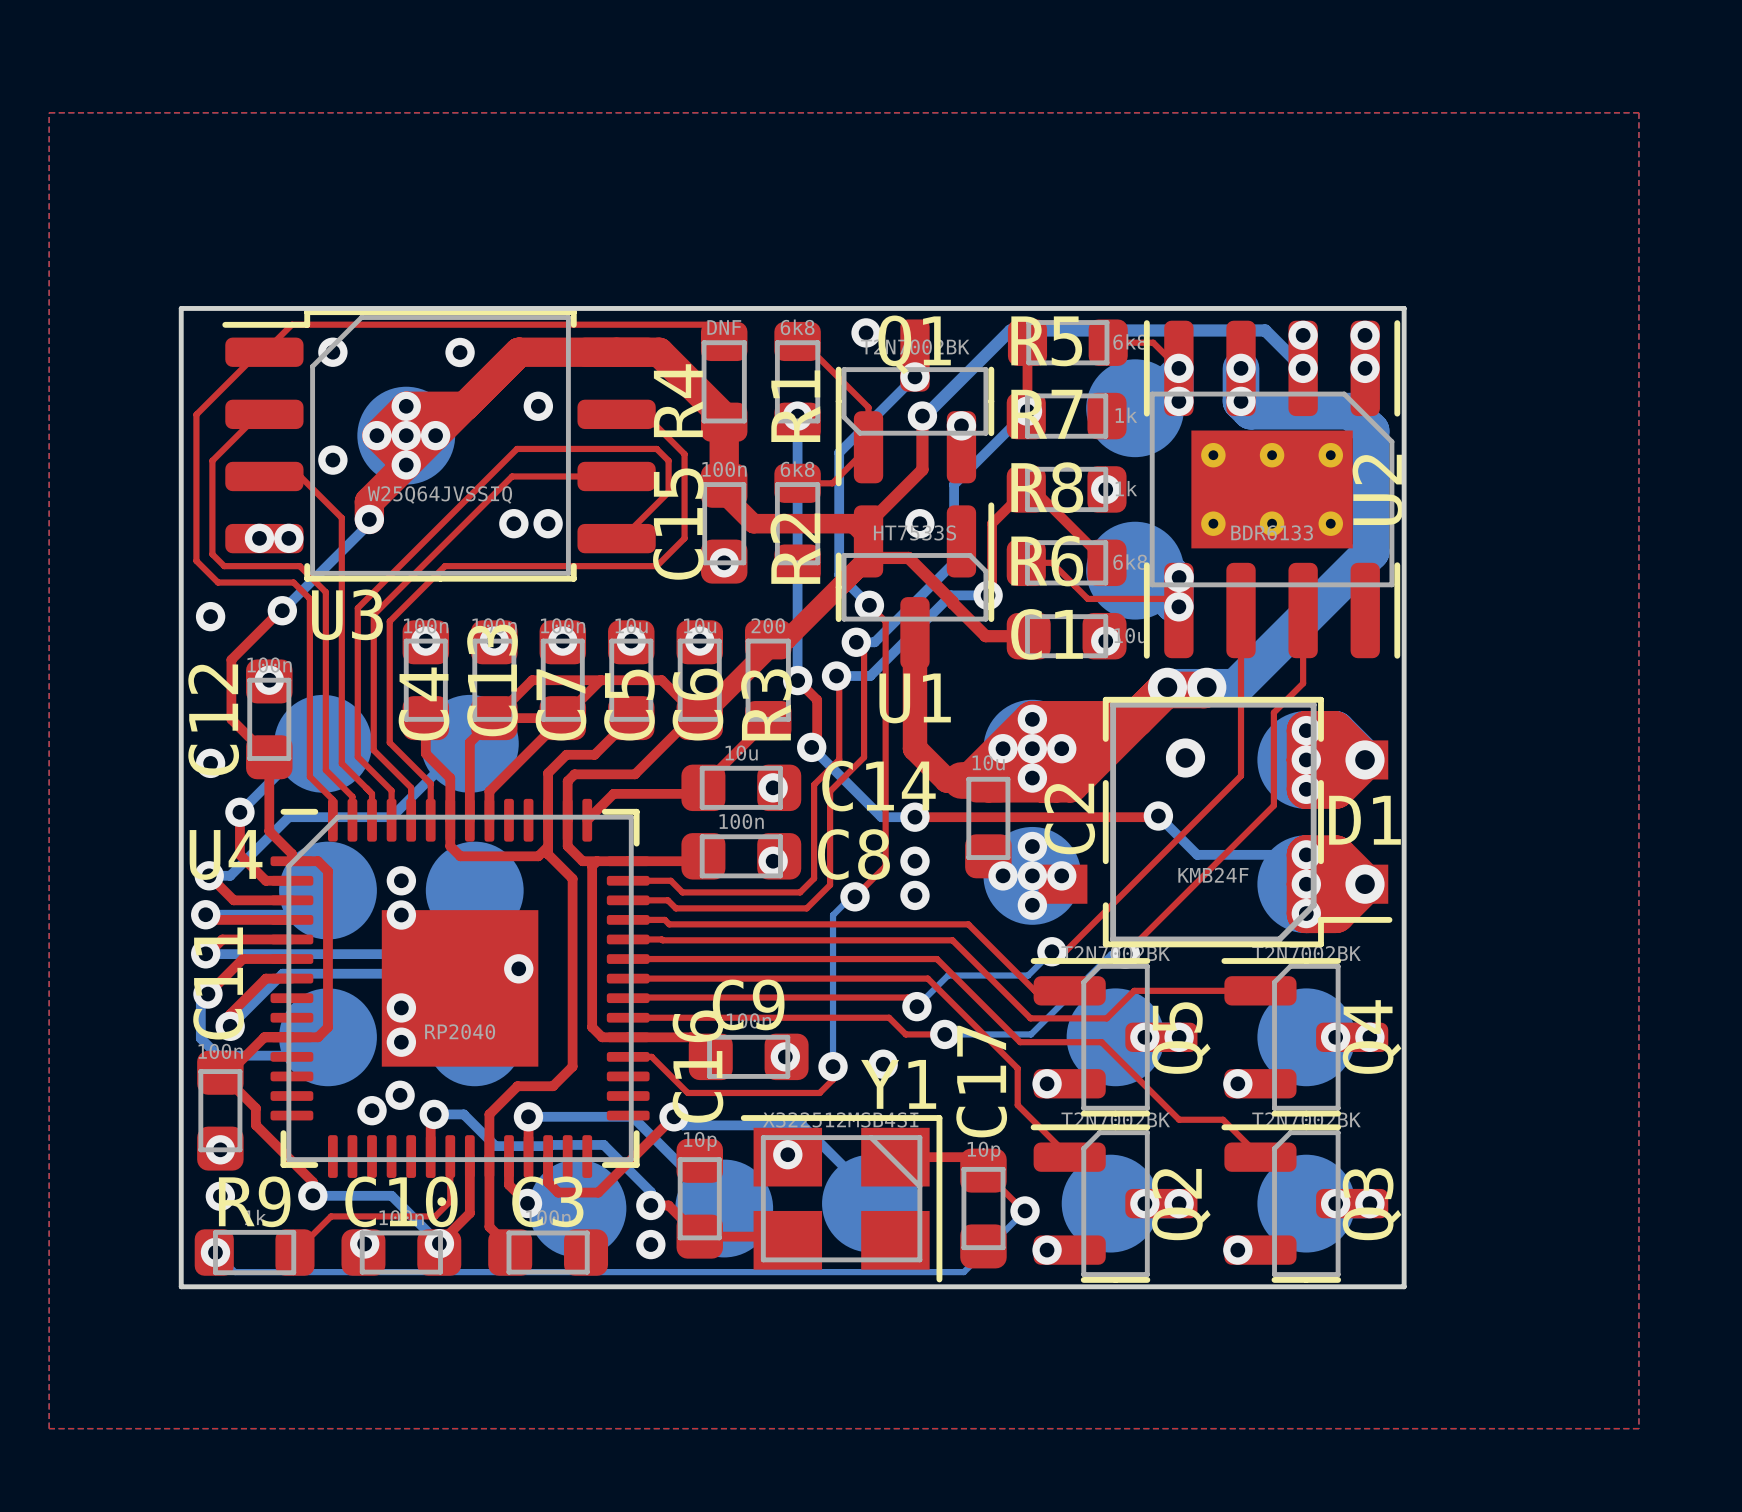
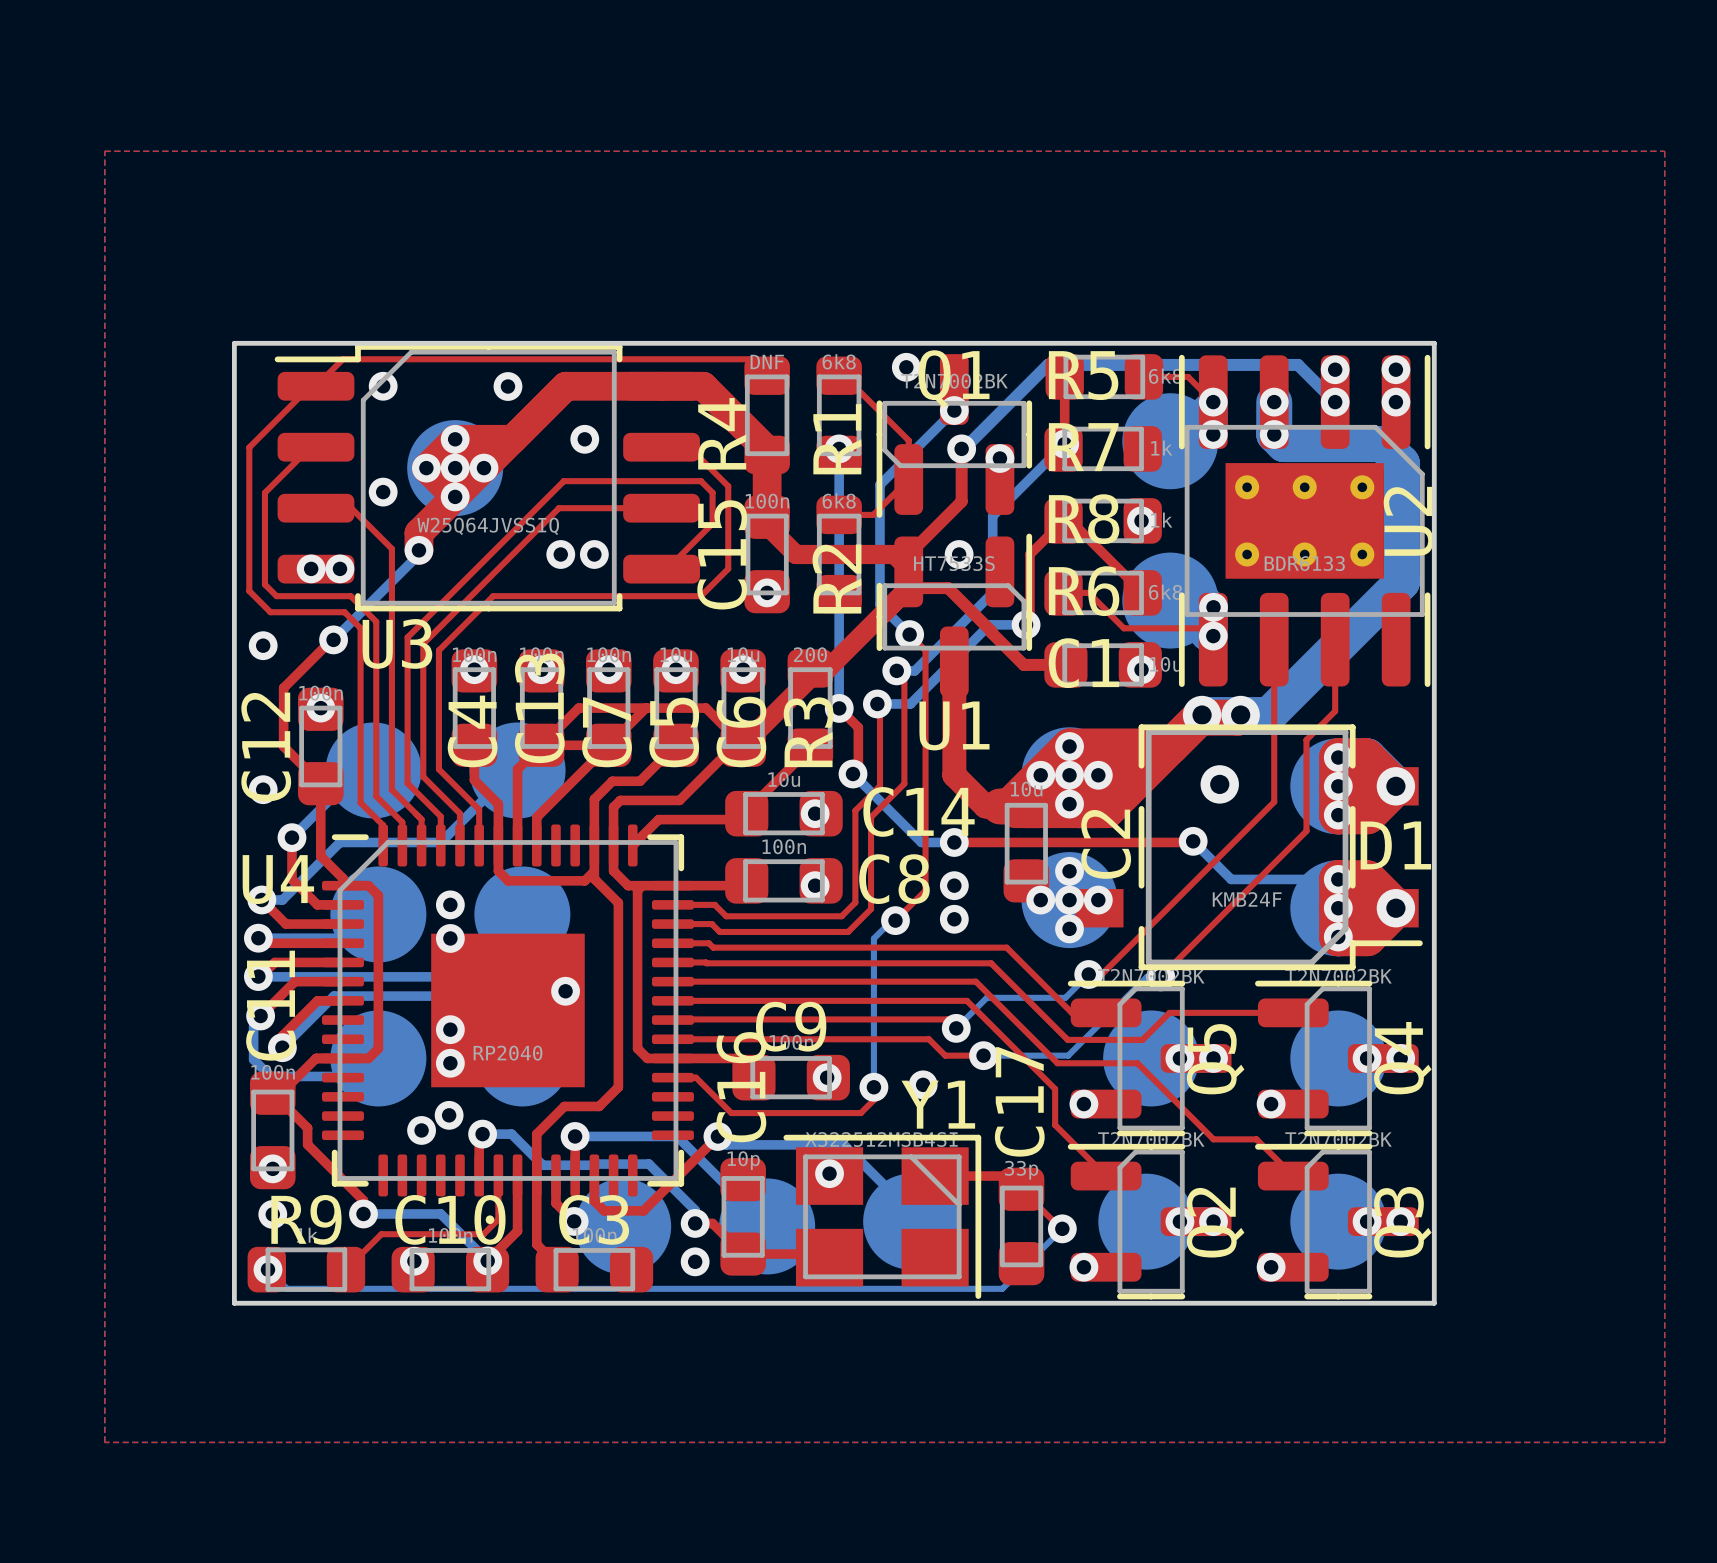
C17 value: 10p (984, 1151) -> 33p (1021, 1170)

